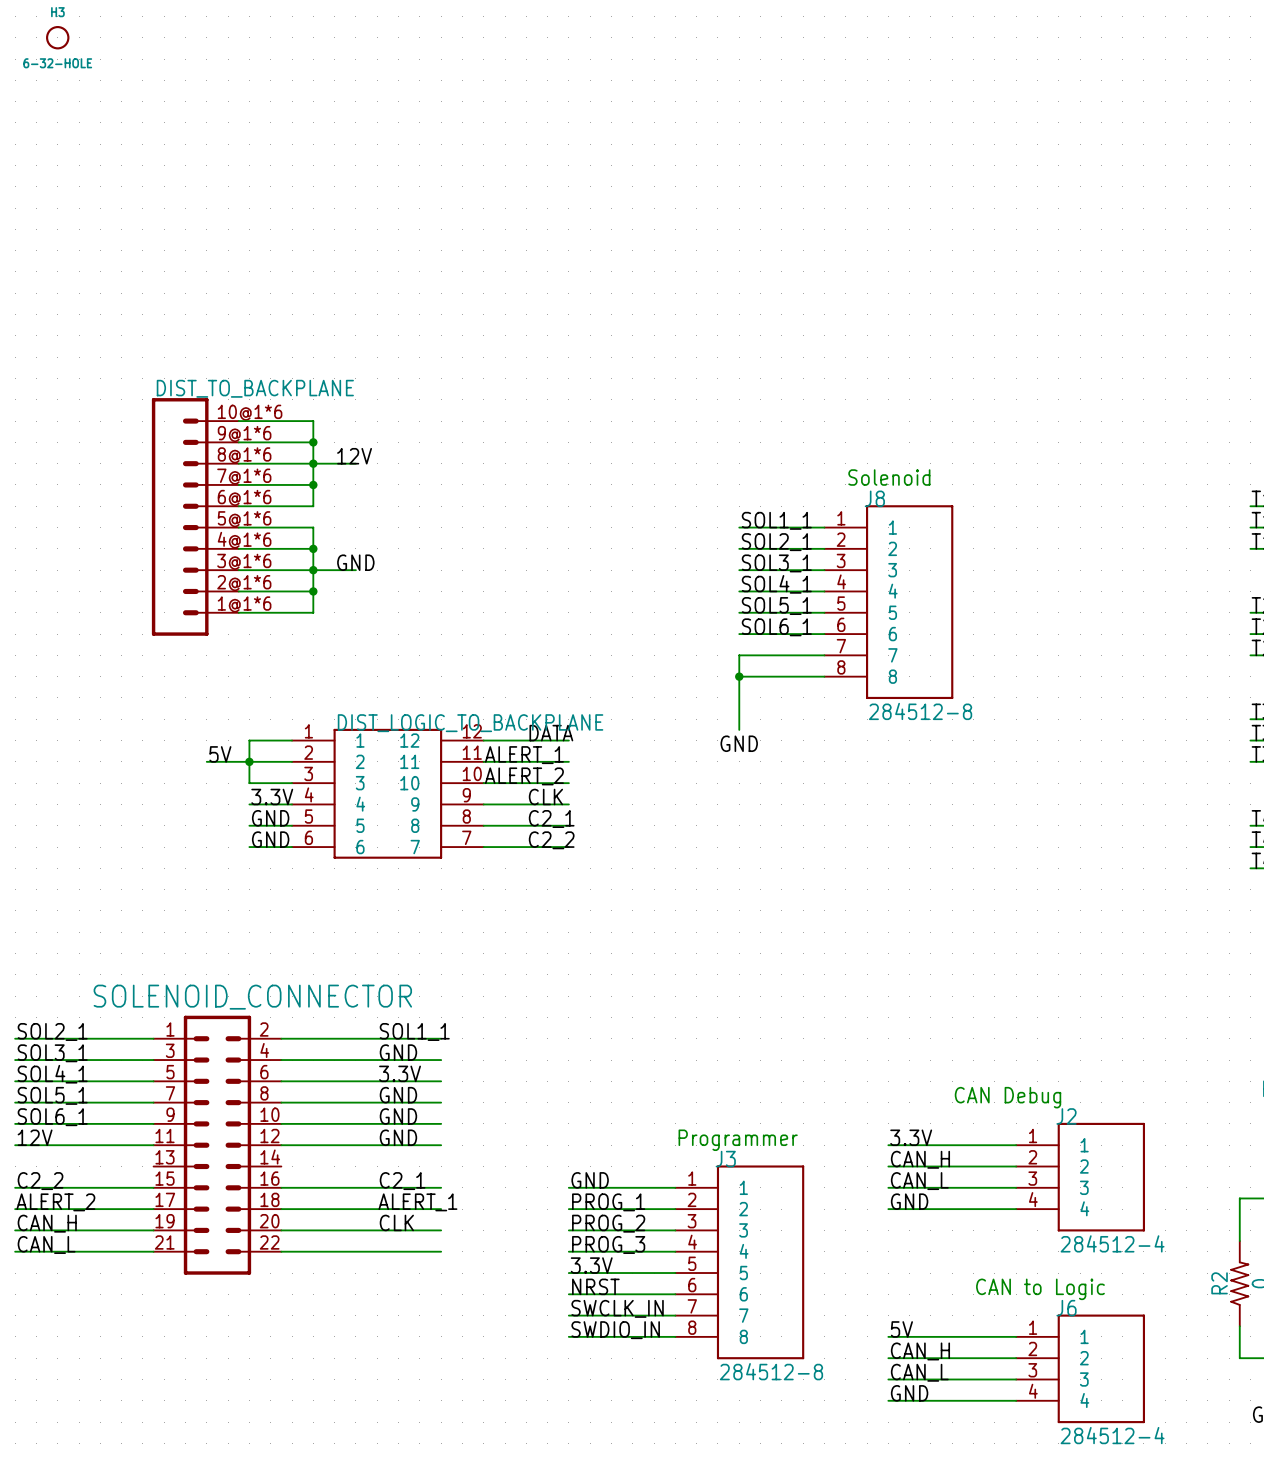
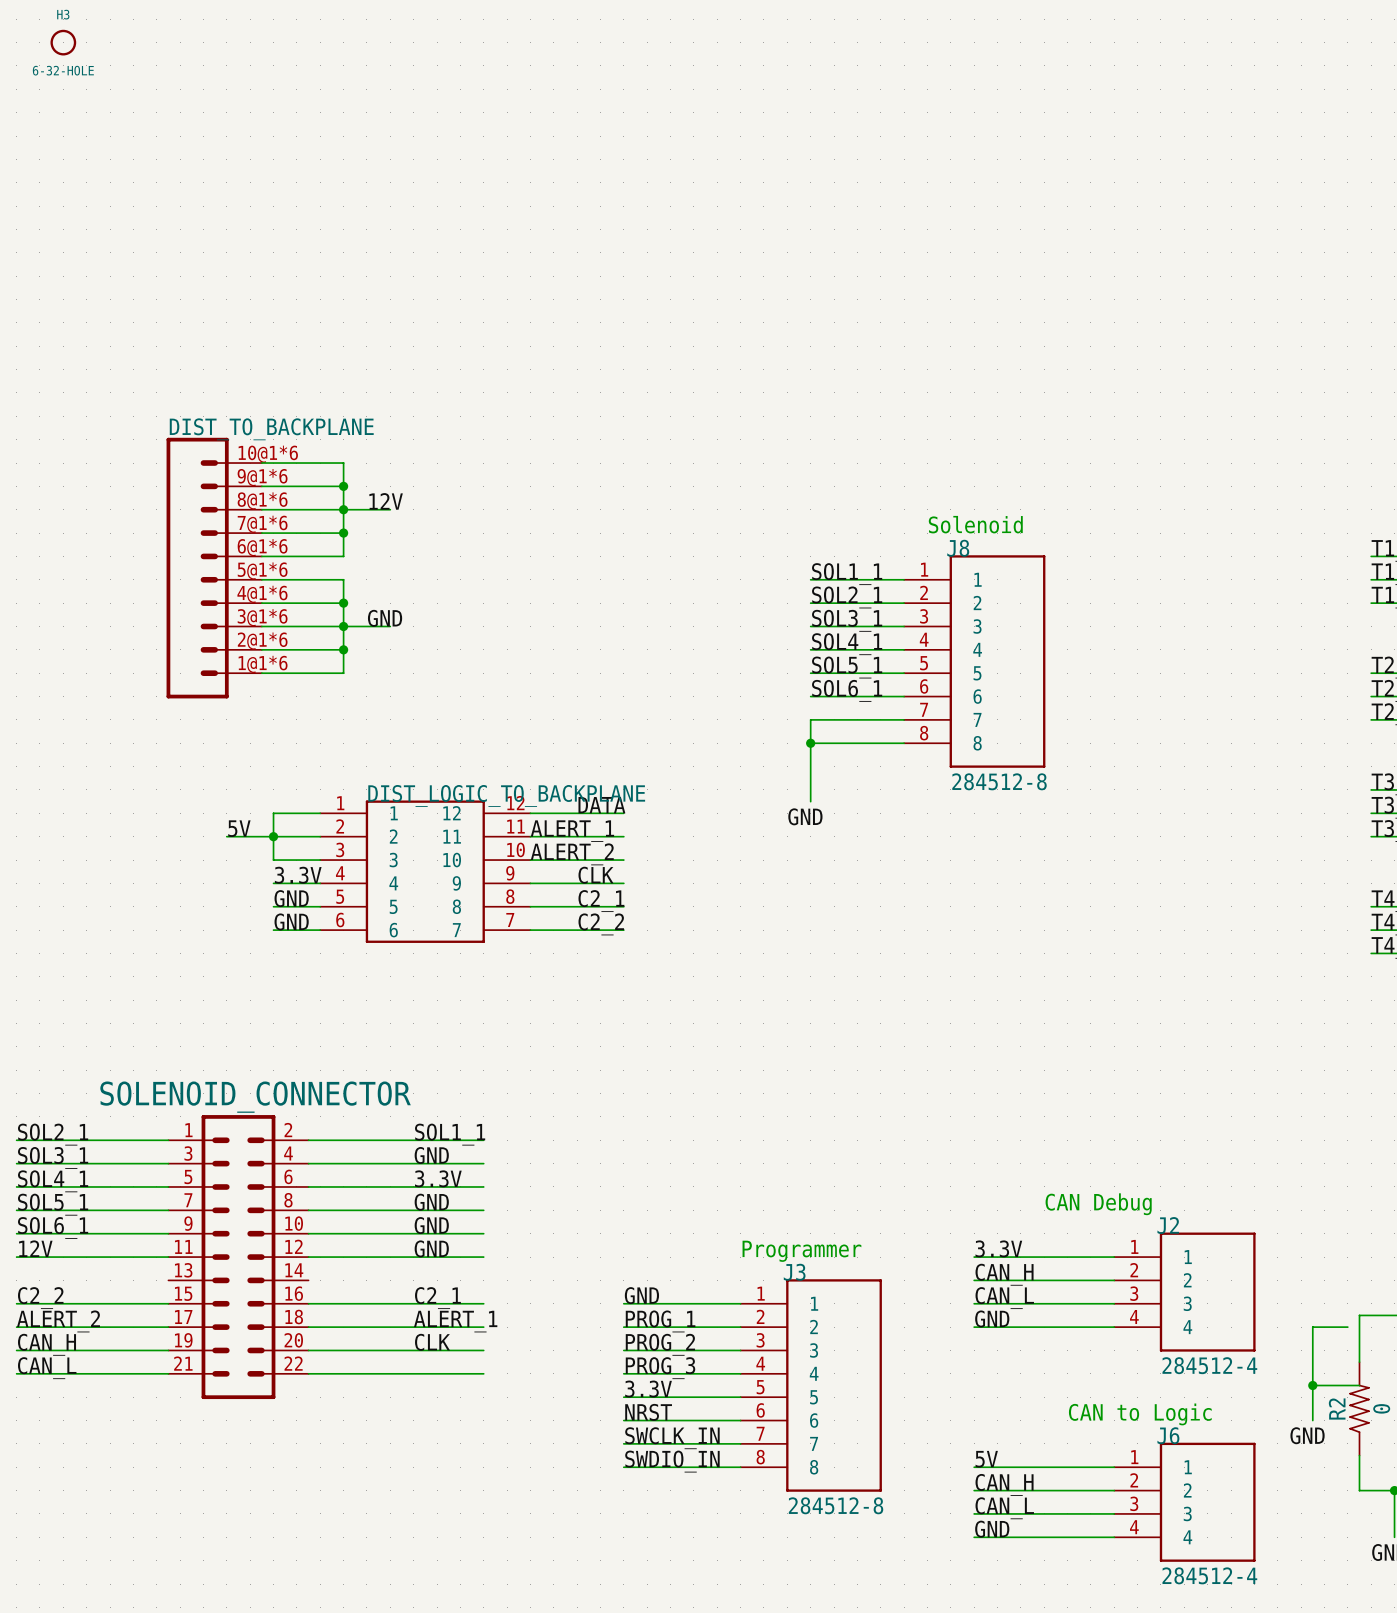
wire: none -> (1347, 1327) (1312, 1327) (1312, 1420)
wire: none -> (1312, 1385) (1359, 1385)
junction: none -> (1312, 1385)
label: none -> GND (1307, 1435)

